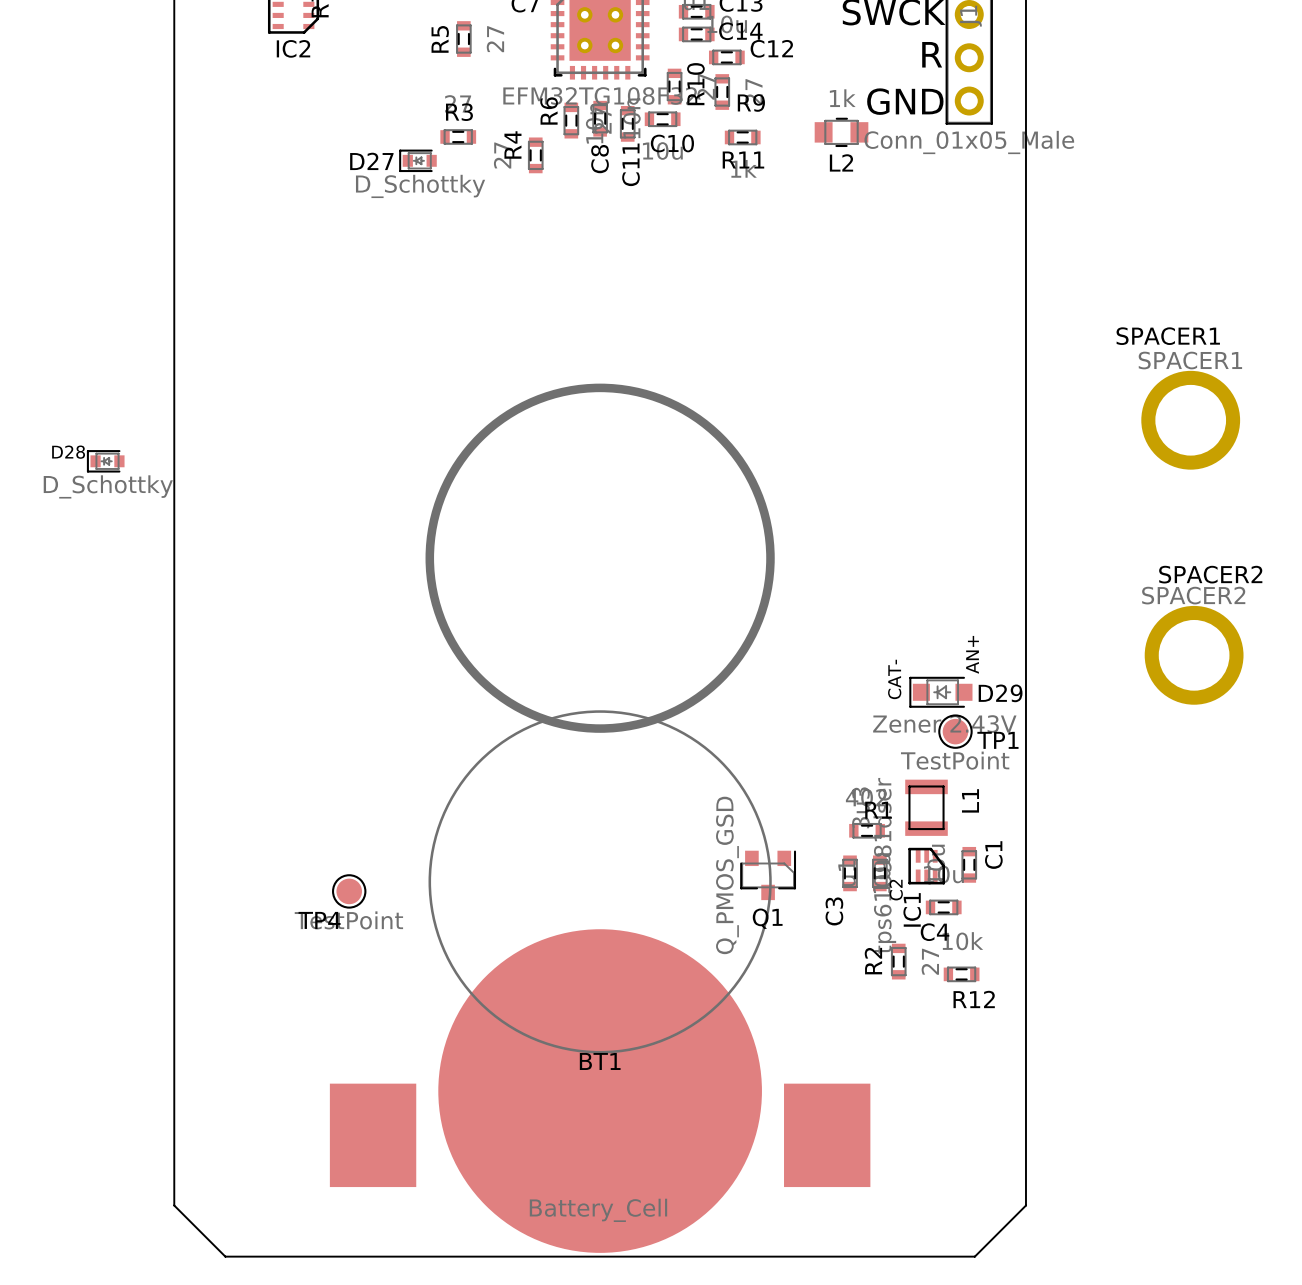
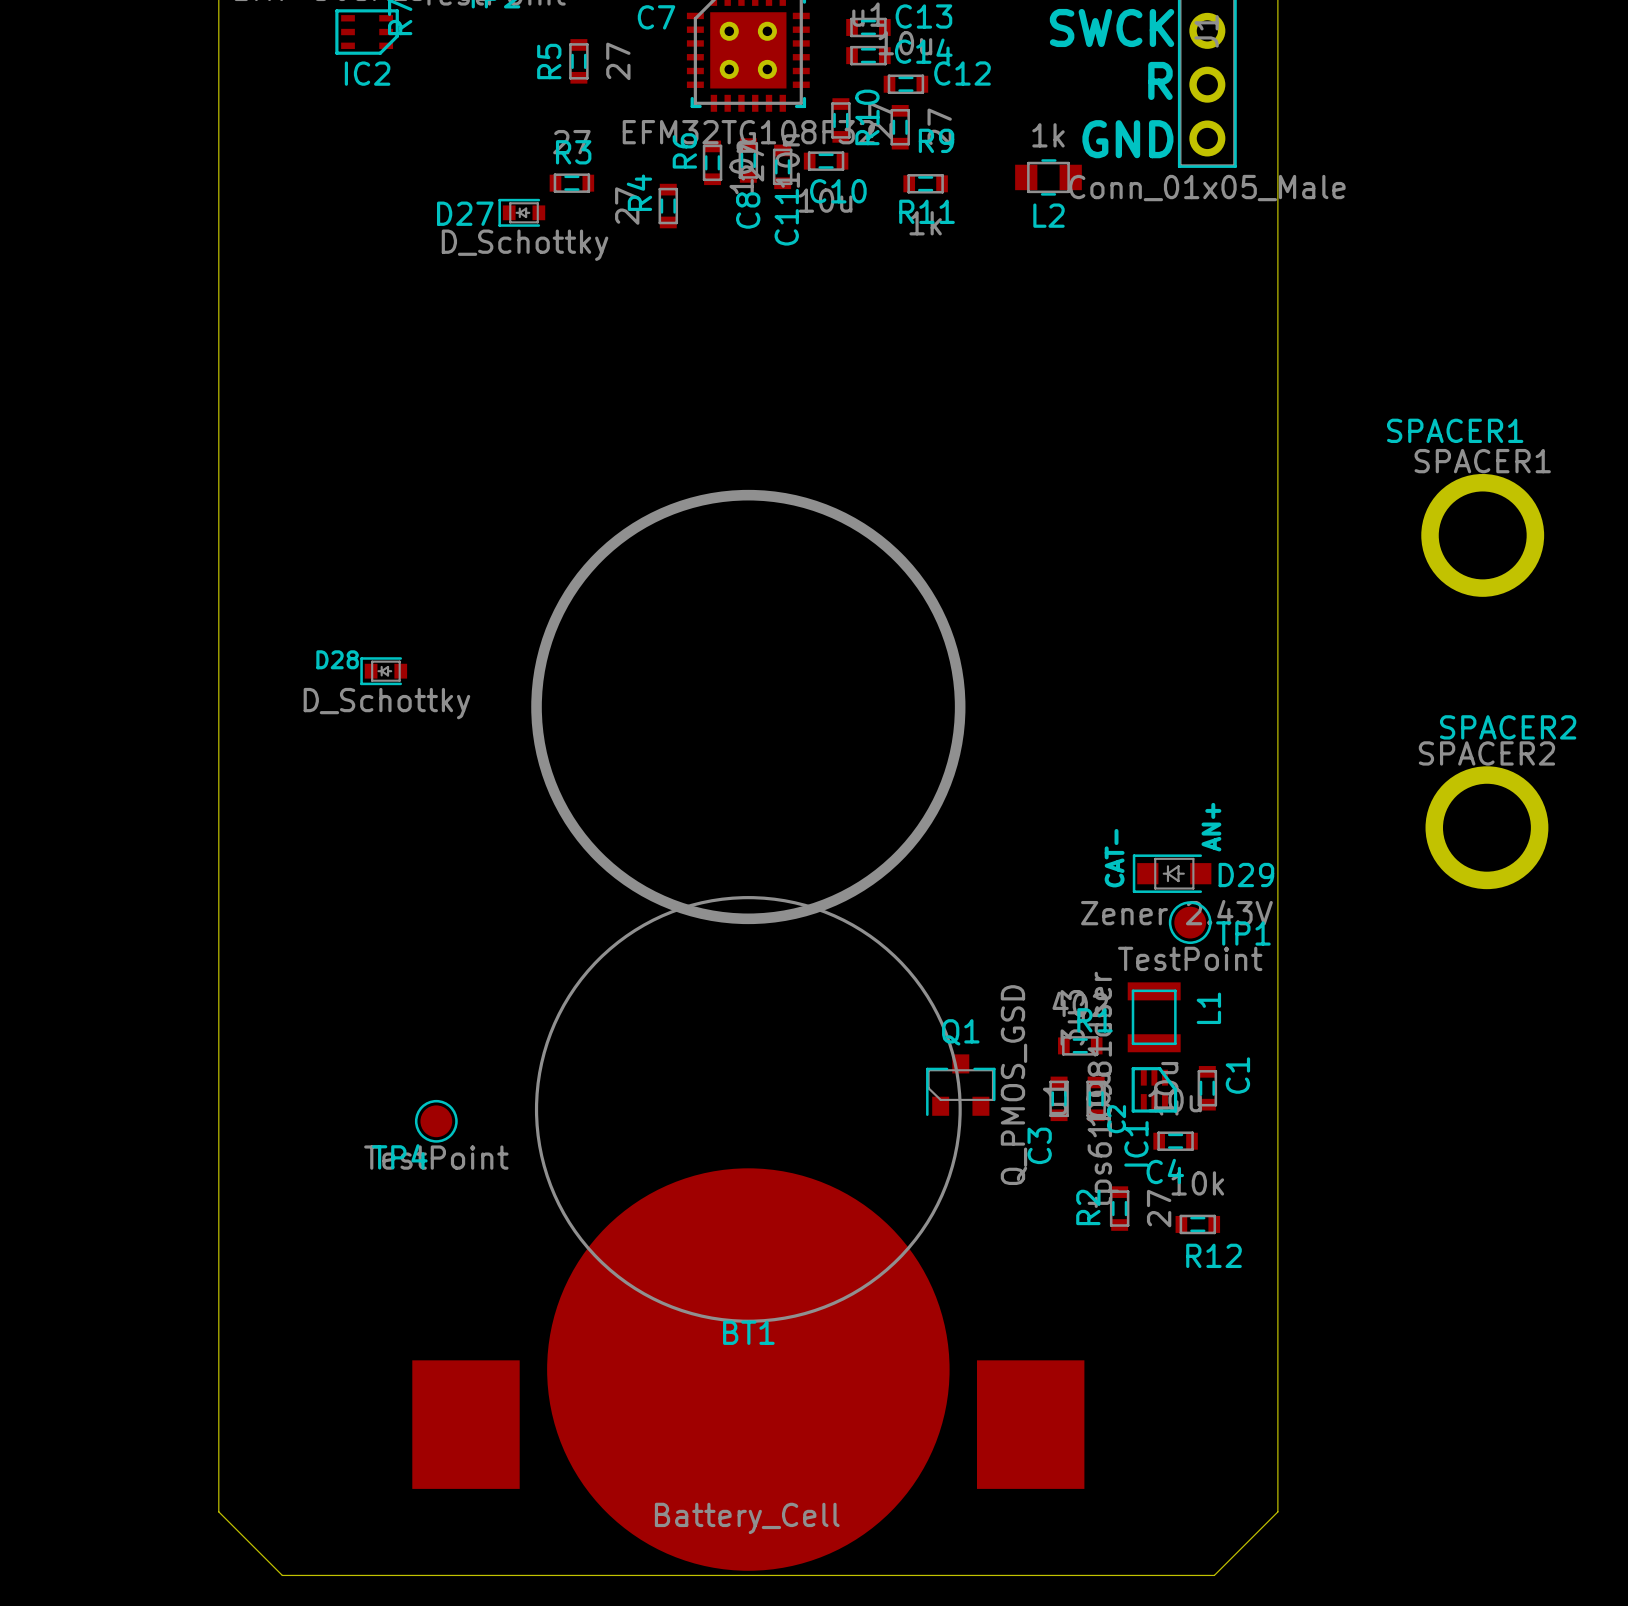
D28 position: (105, 461) -> (383, 671)
Q1 rotation: 0° (768, 875) -> 180° (960, 1085)

